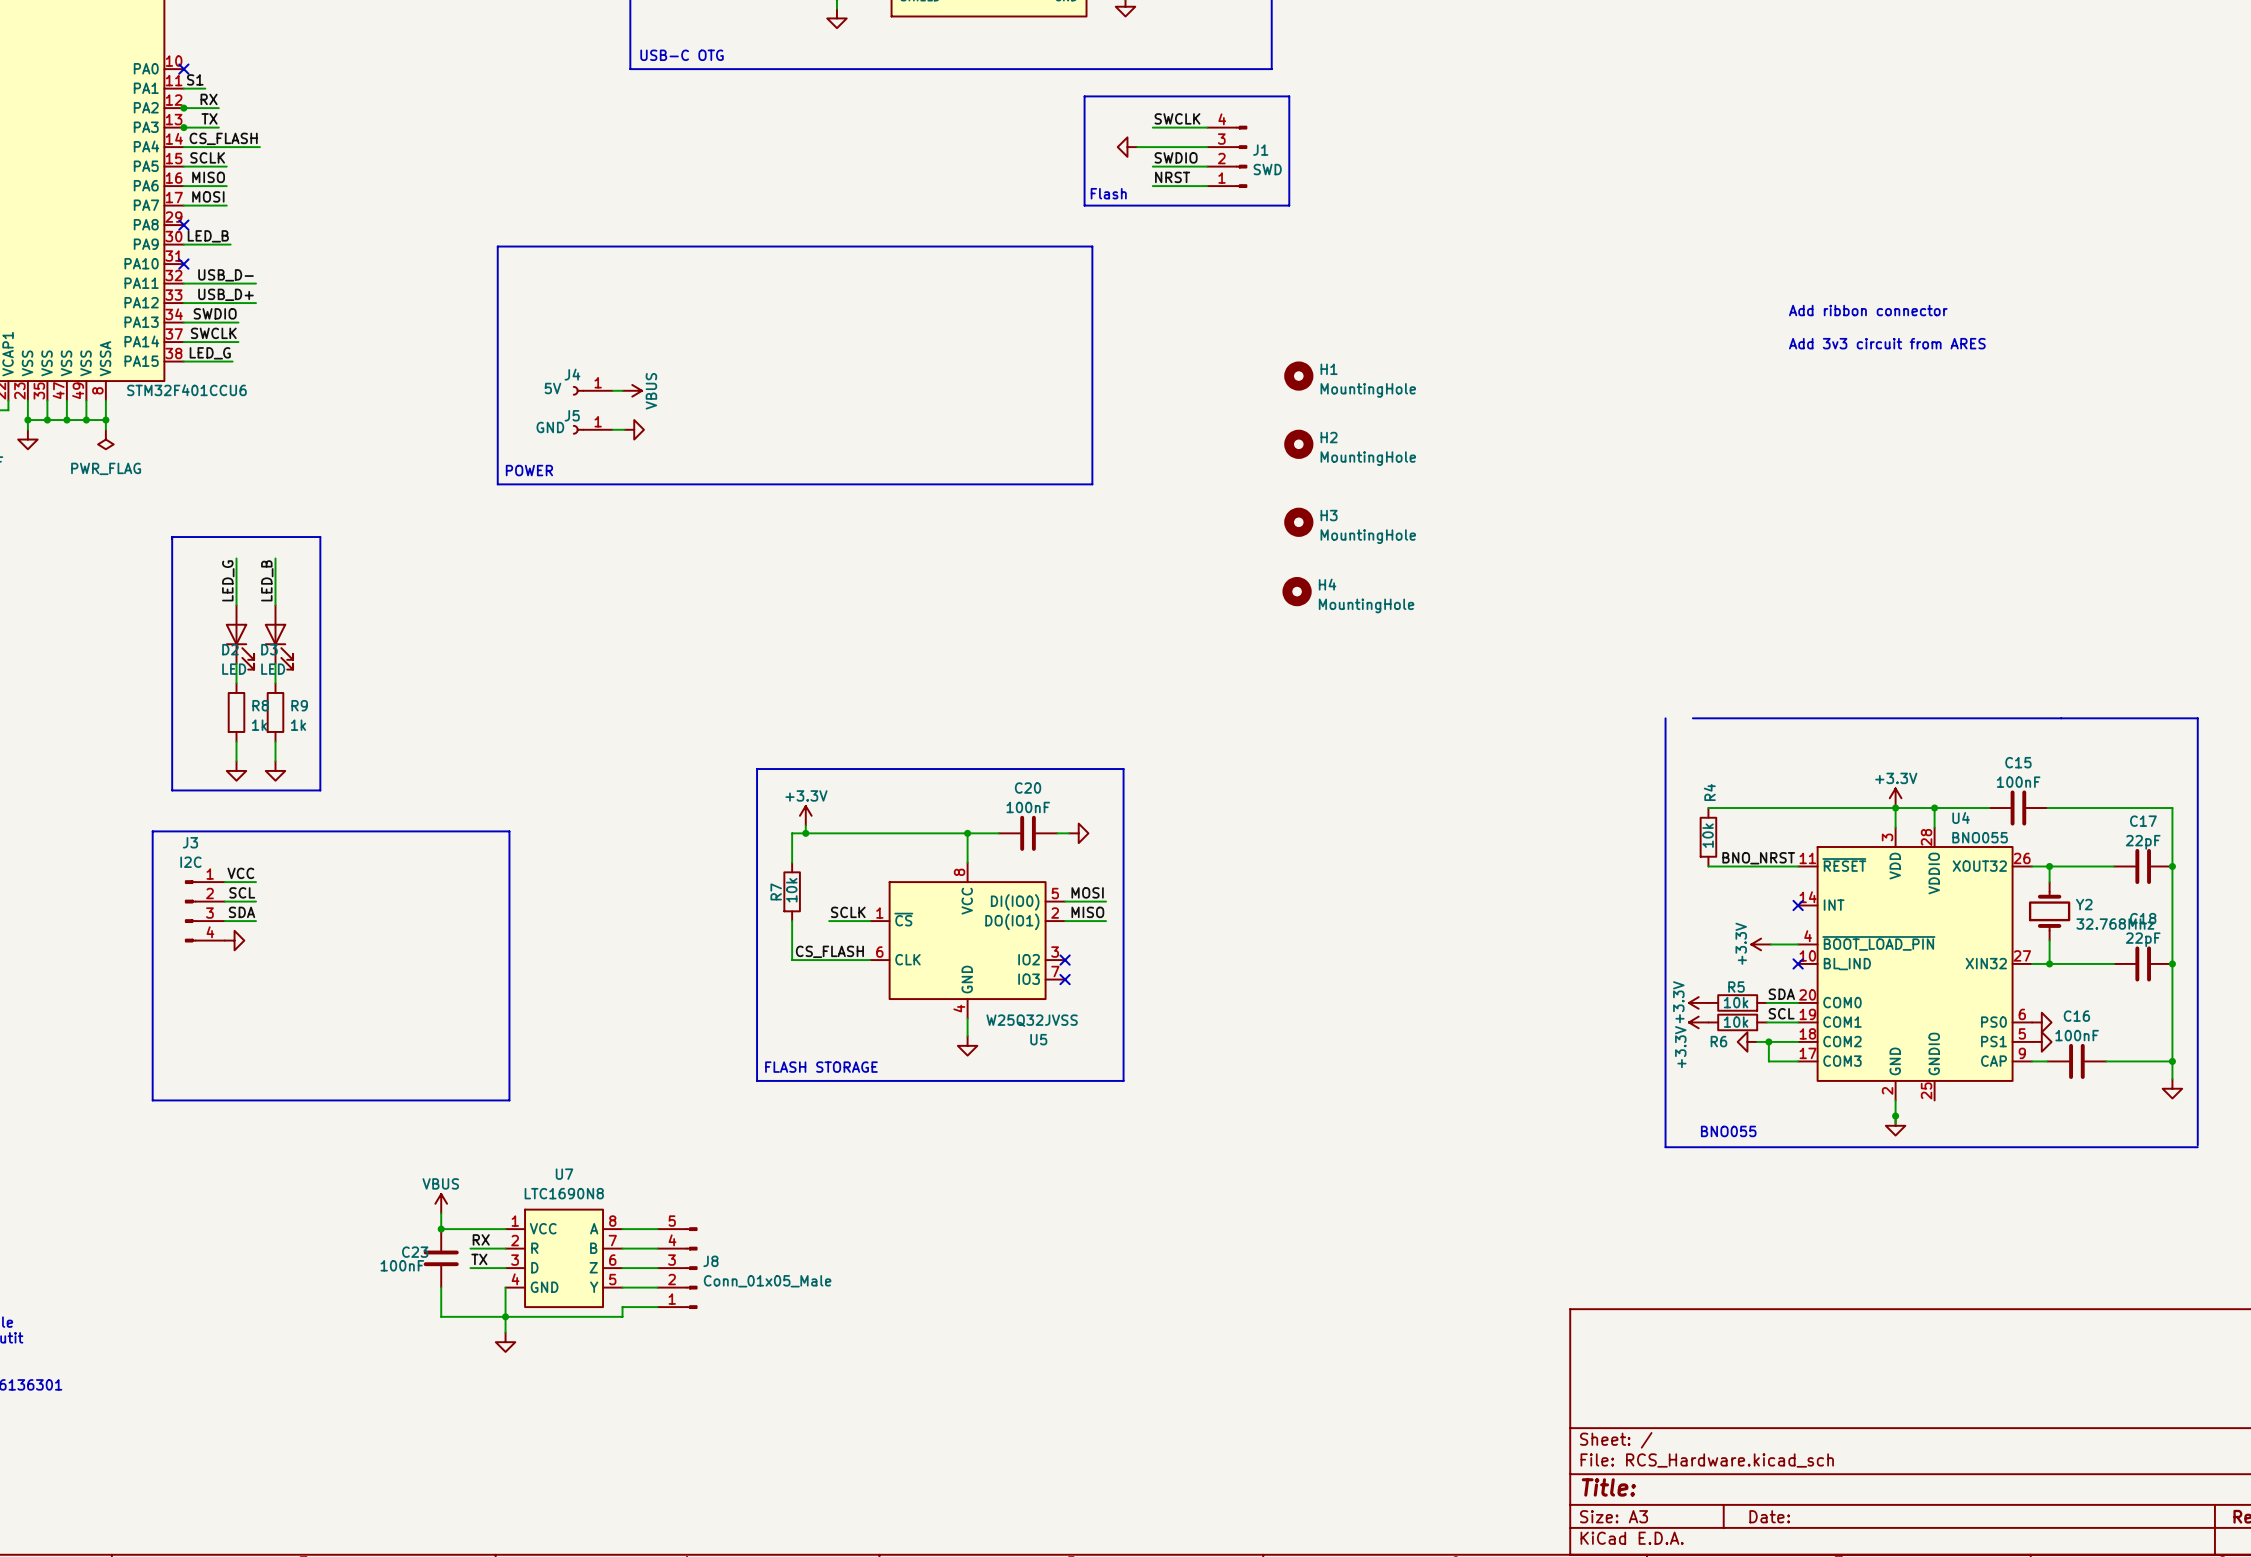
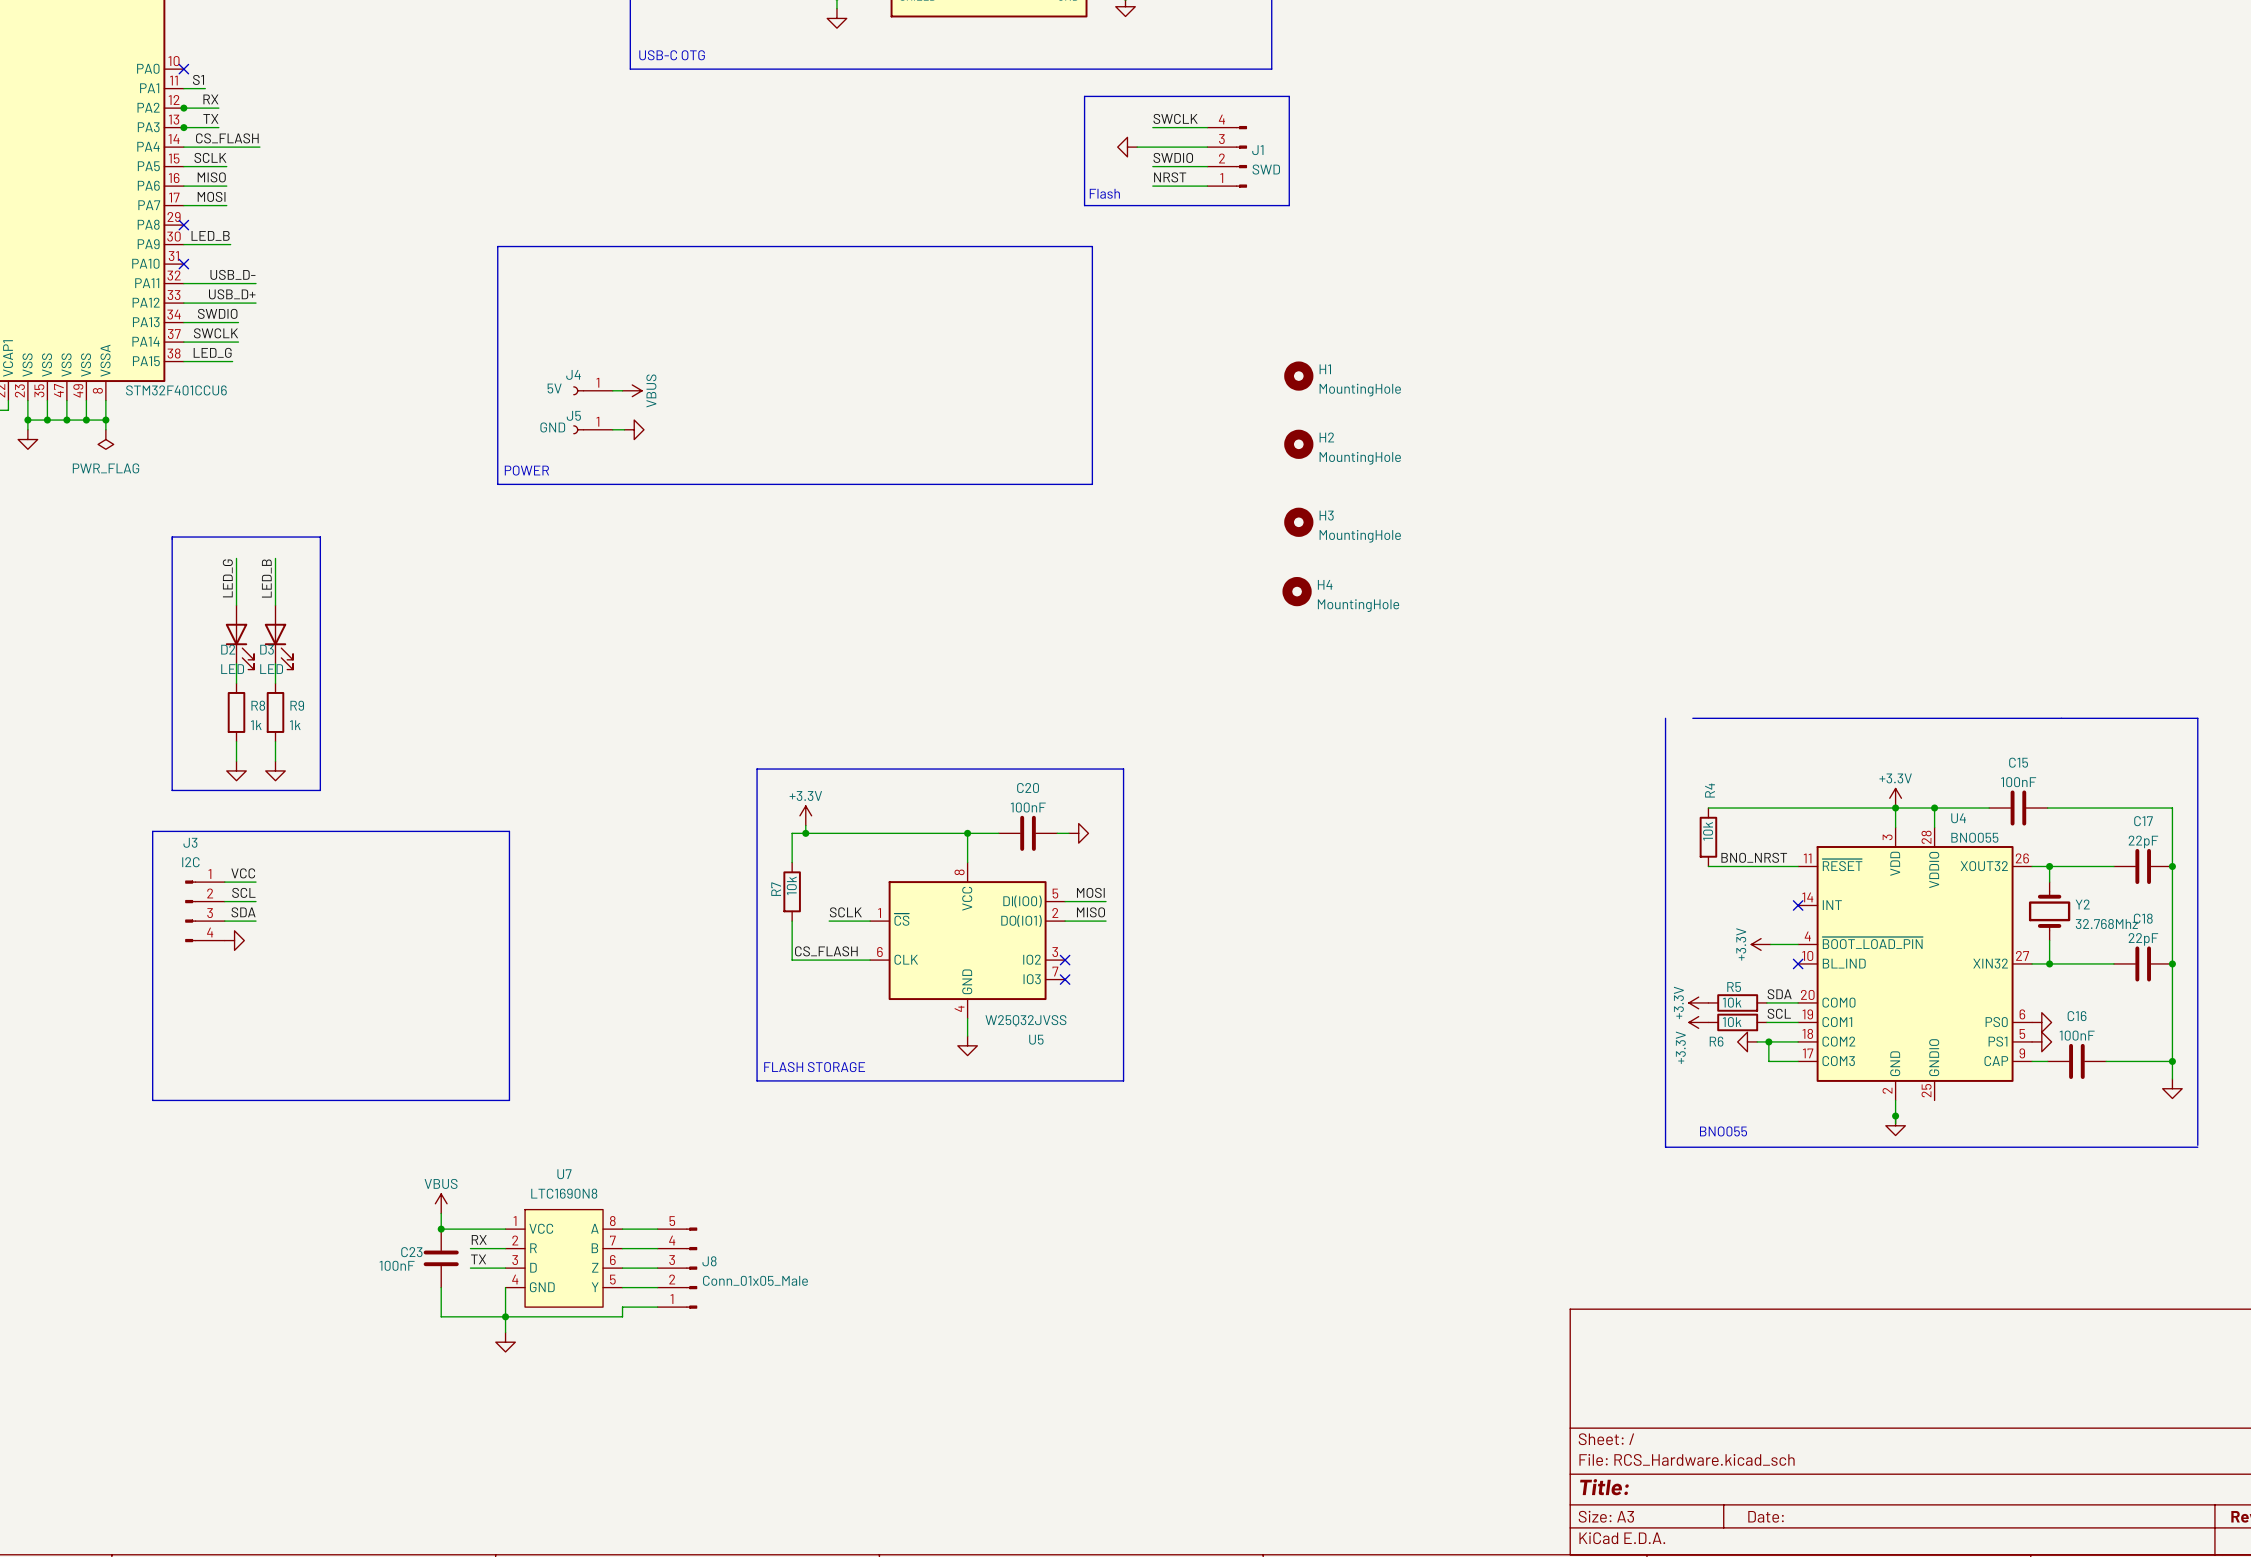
text: Add ribbon connector (1868, 310) -> none
text: Add 3v3 circuit from ARES (1887, 343) -> none

